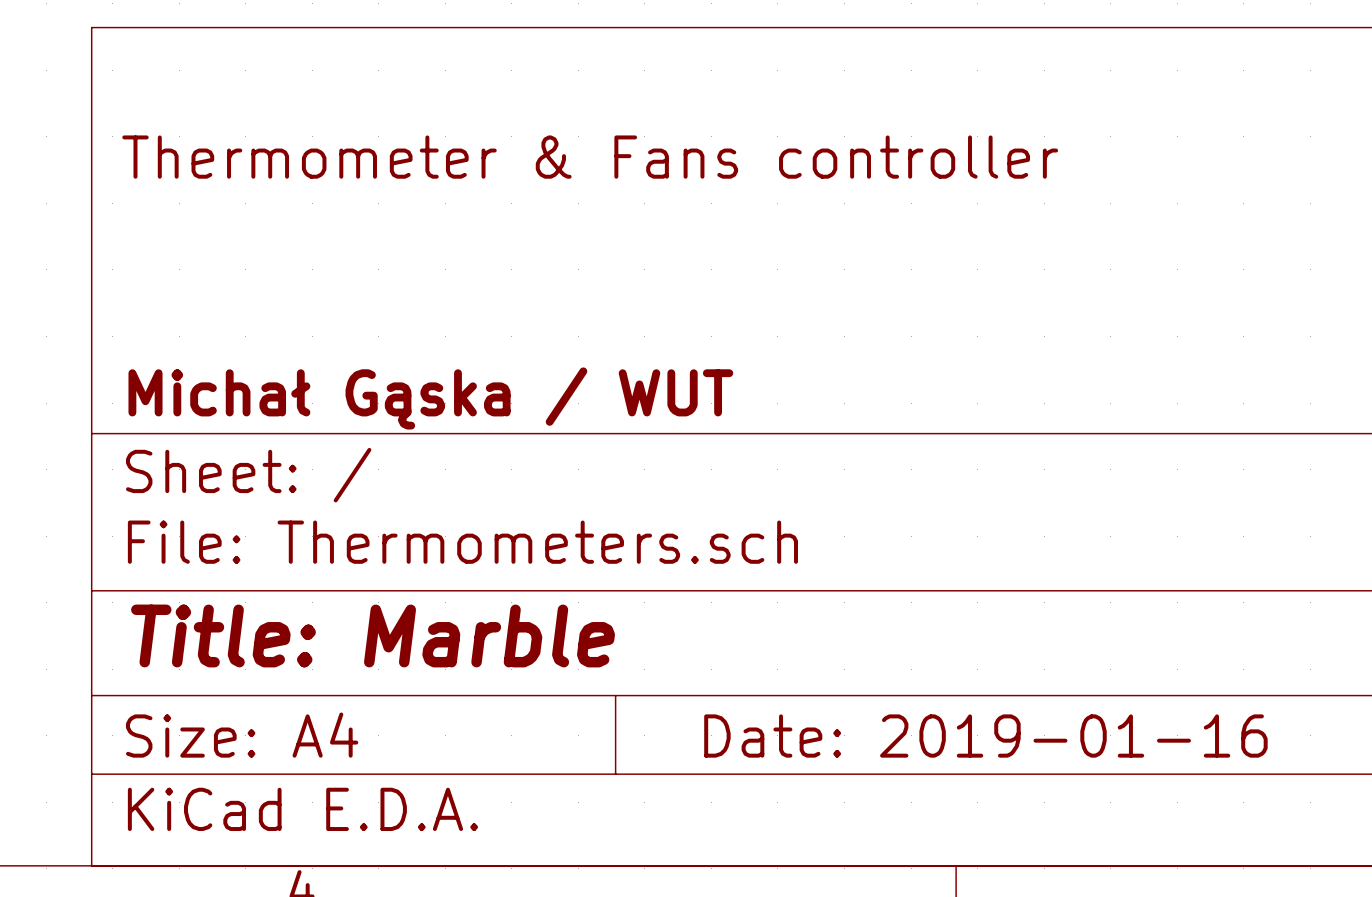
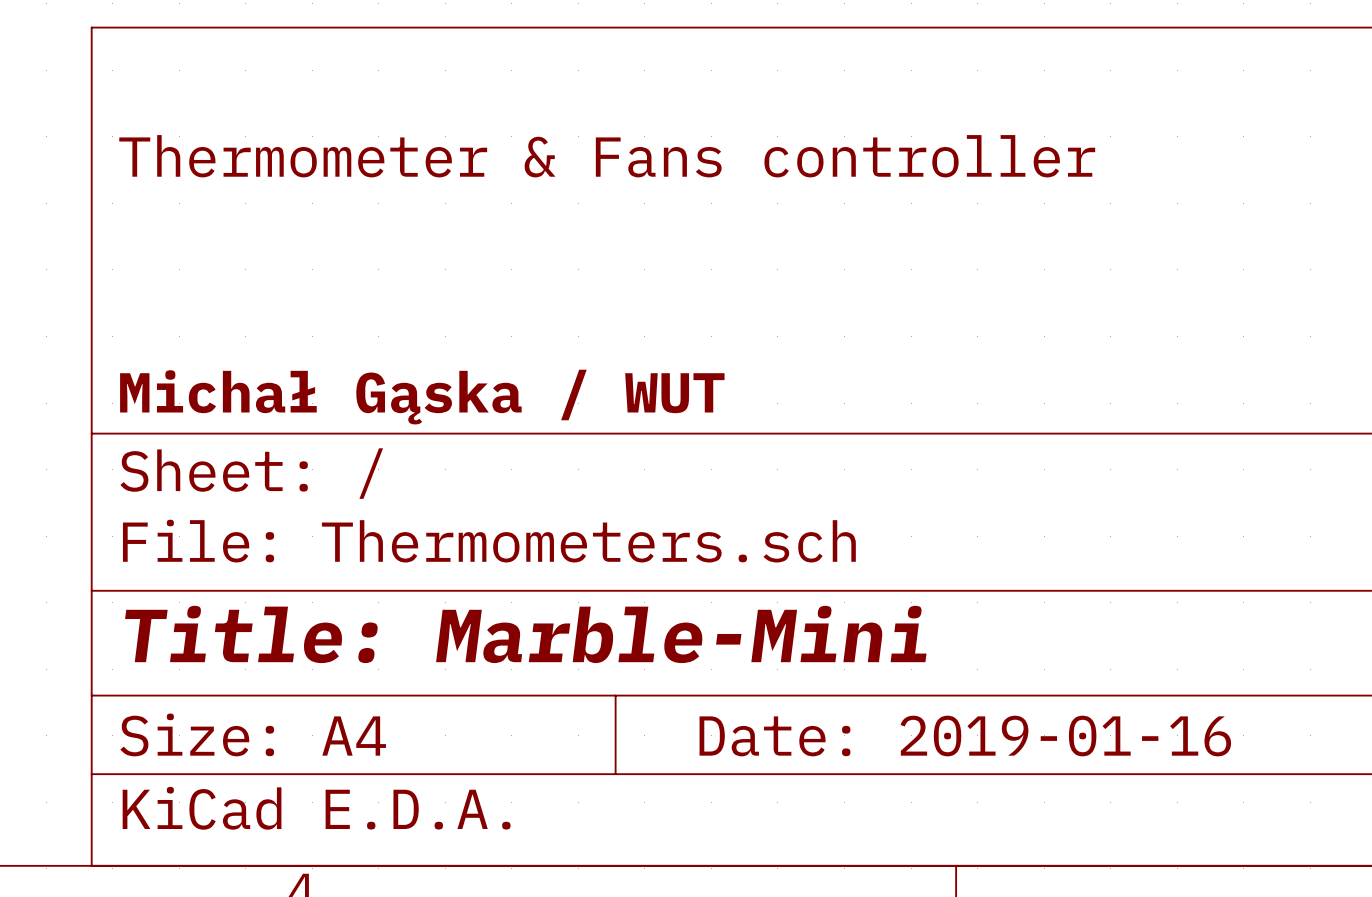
title block: Title: Marble (373, 635) -> Title: Marble-Mini (525, 634)

